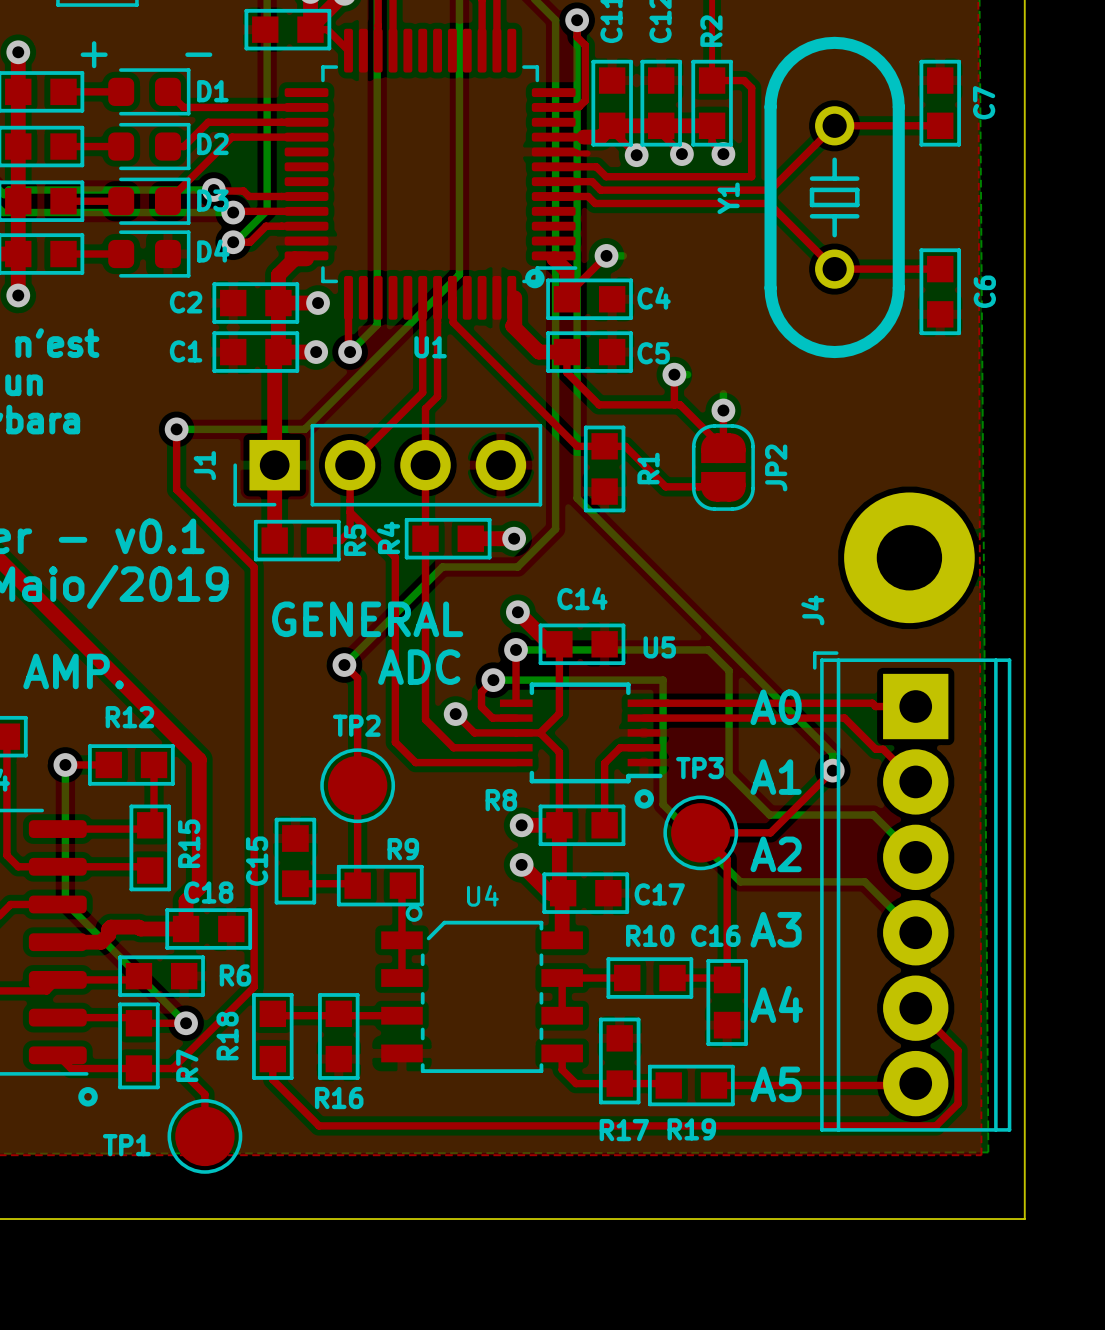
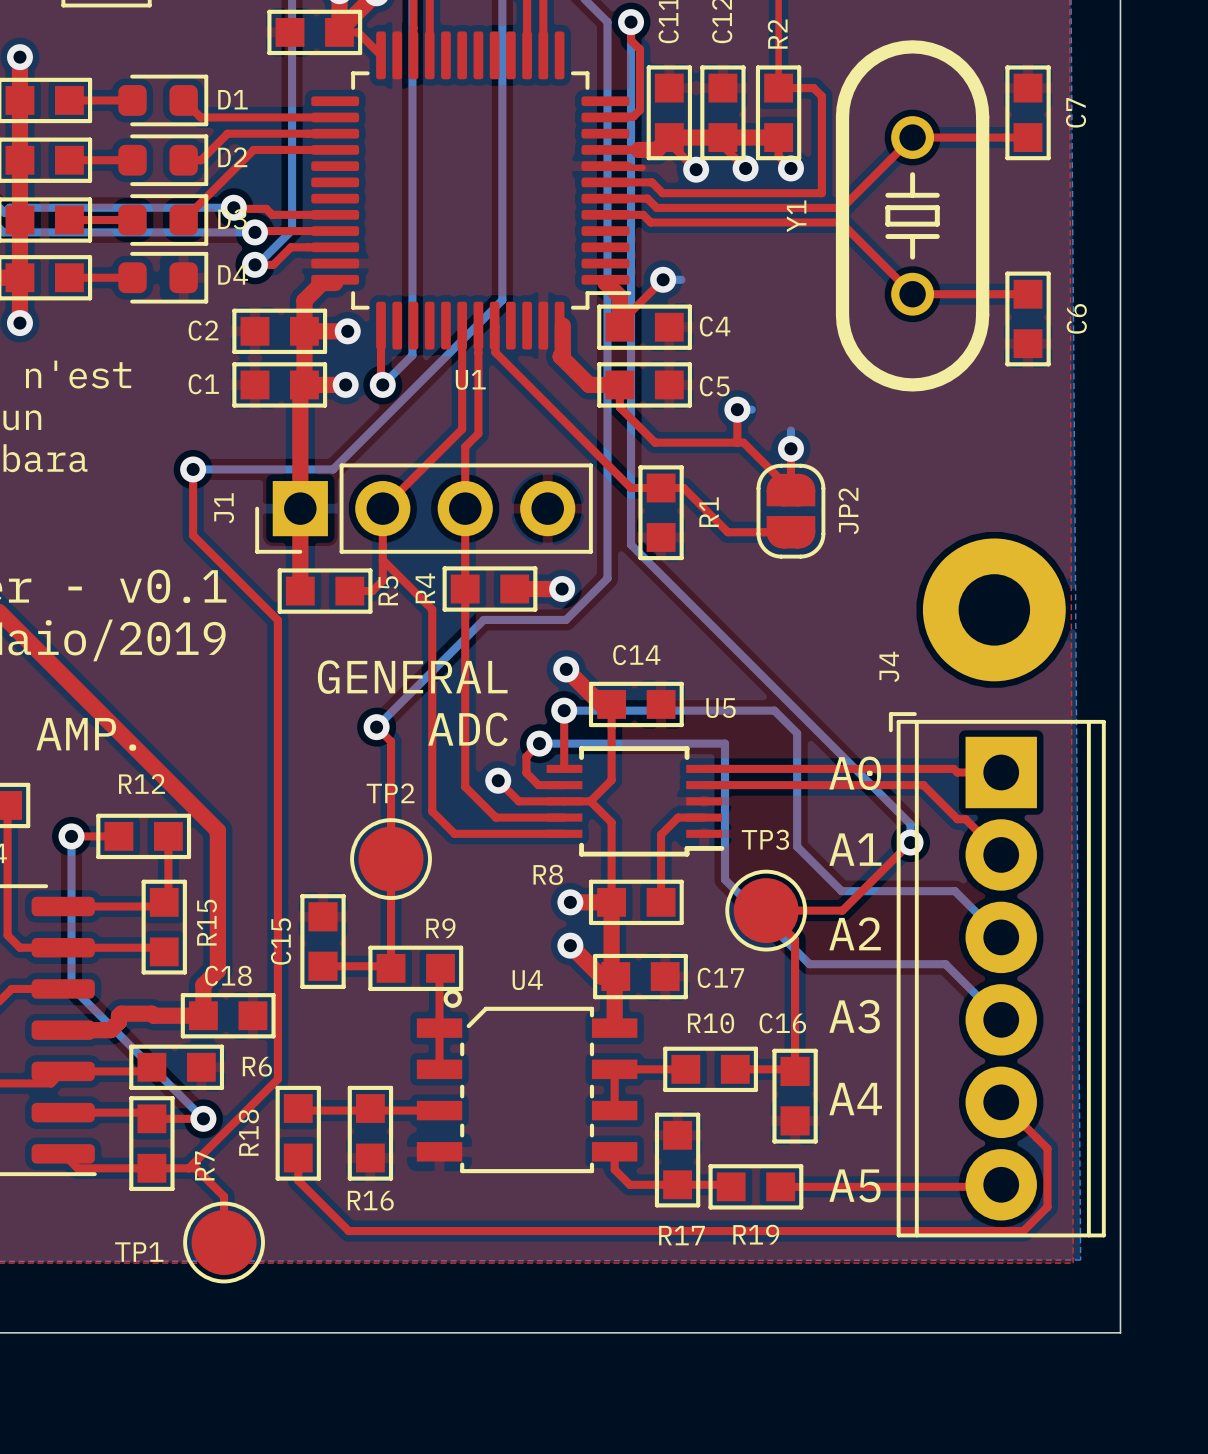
text: + - (146, 54) -> none
drawing: [525, 268, 545, 289] -> none
drawing: [634, 789, 654, 809] -> none
drawing: [78, 1087, 98, 1107] -> none

